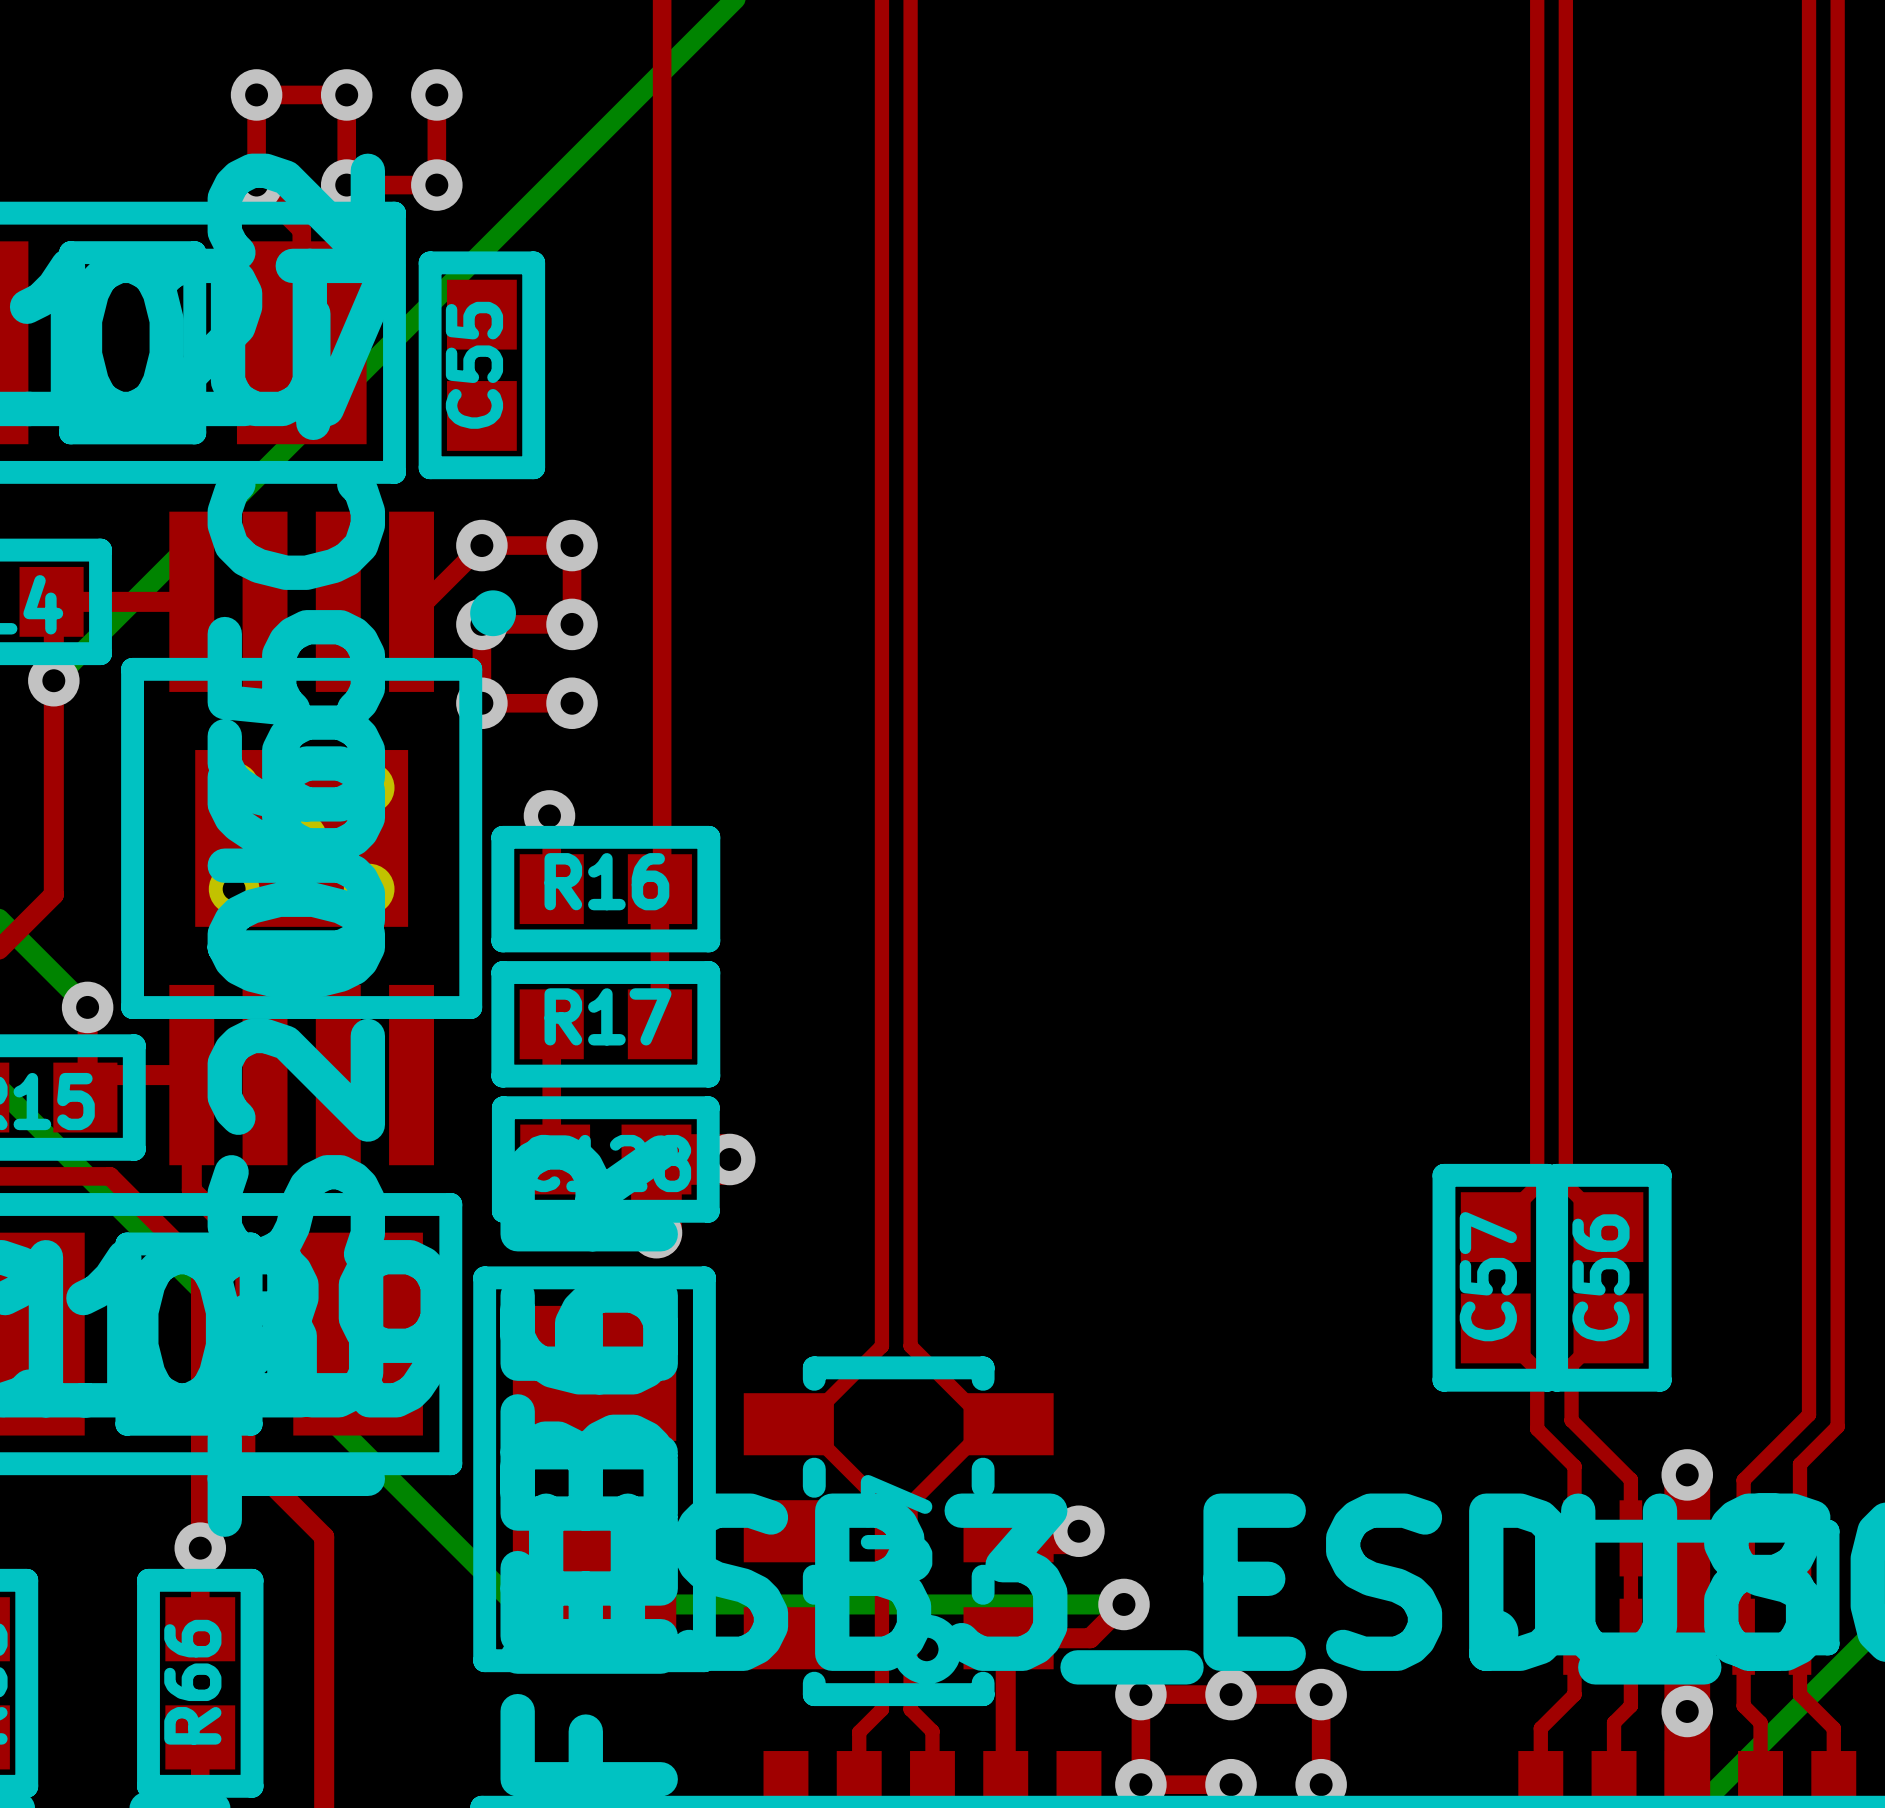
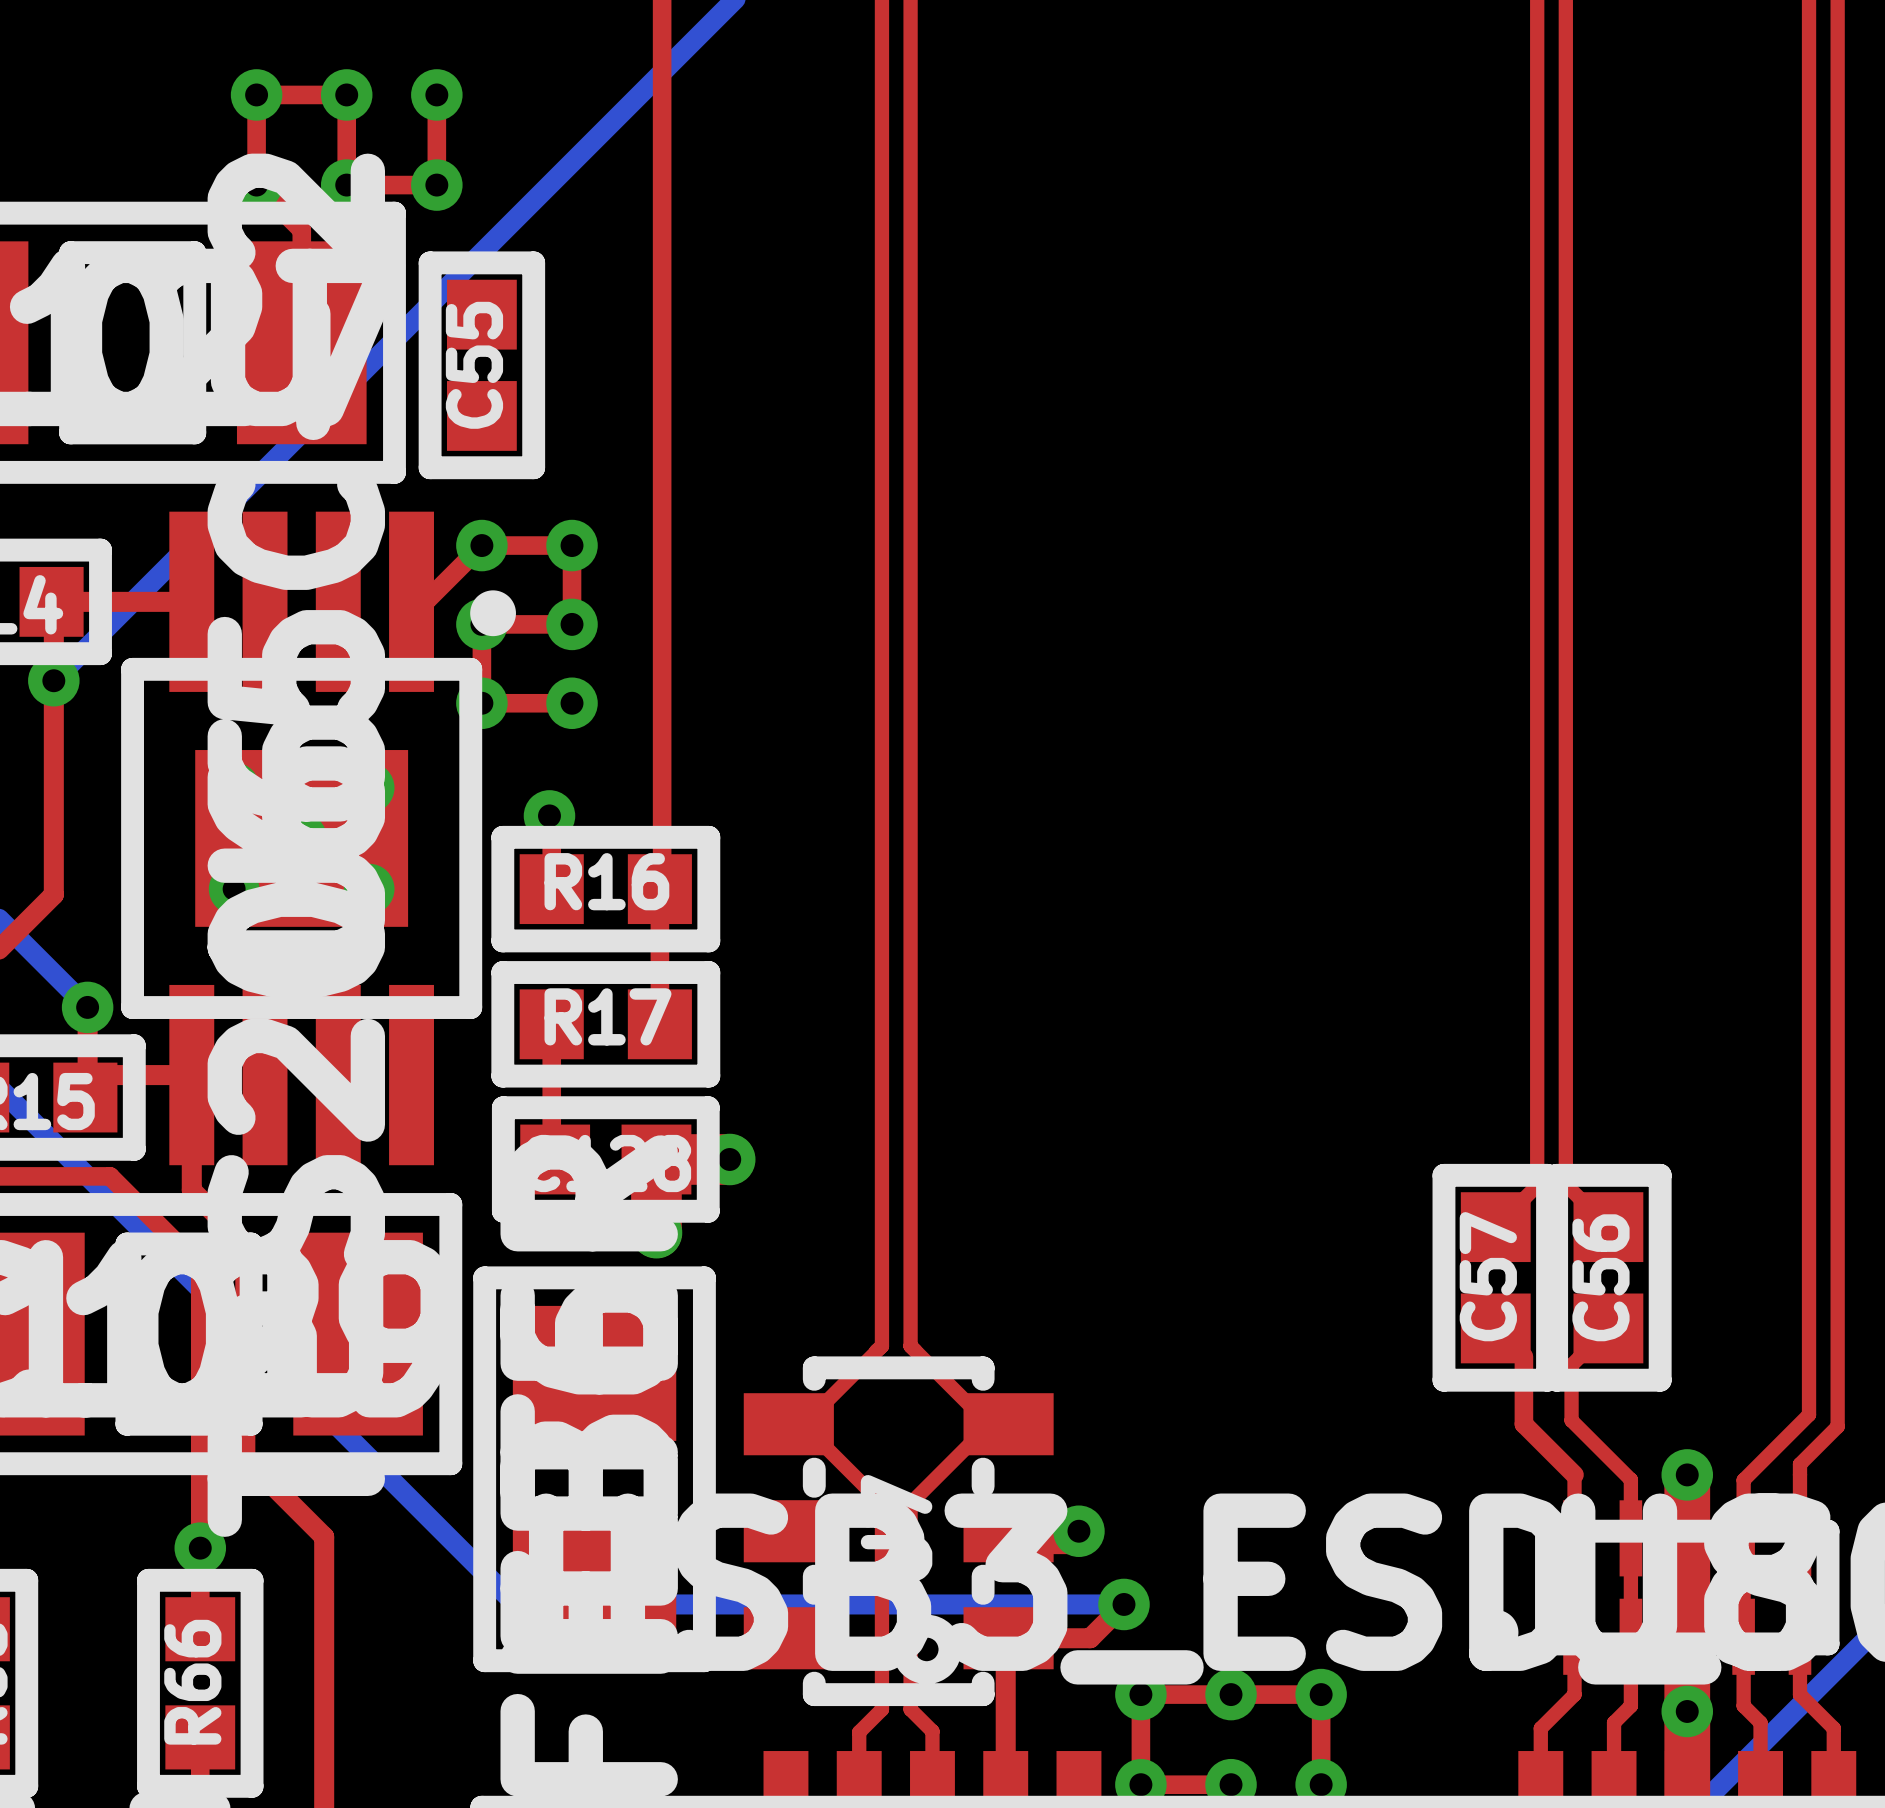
top track: (1523, 1356) (1537, 1369) (1537, 1429) (1574, 1466) (1574, 1474) -> (1523, 1356) (1523, 1424) (1574, 1474)

